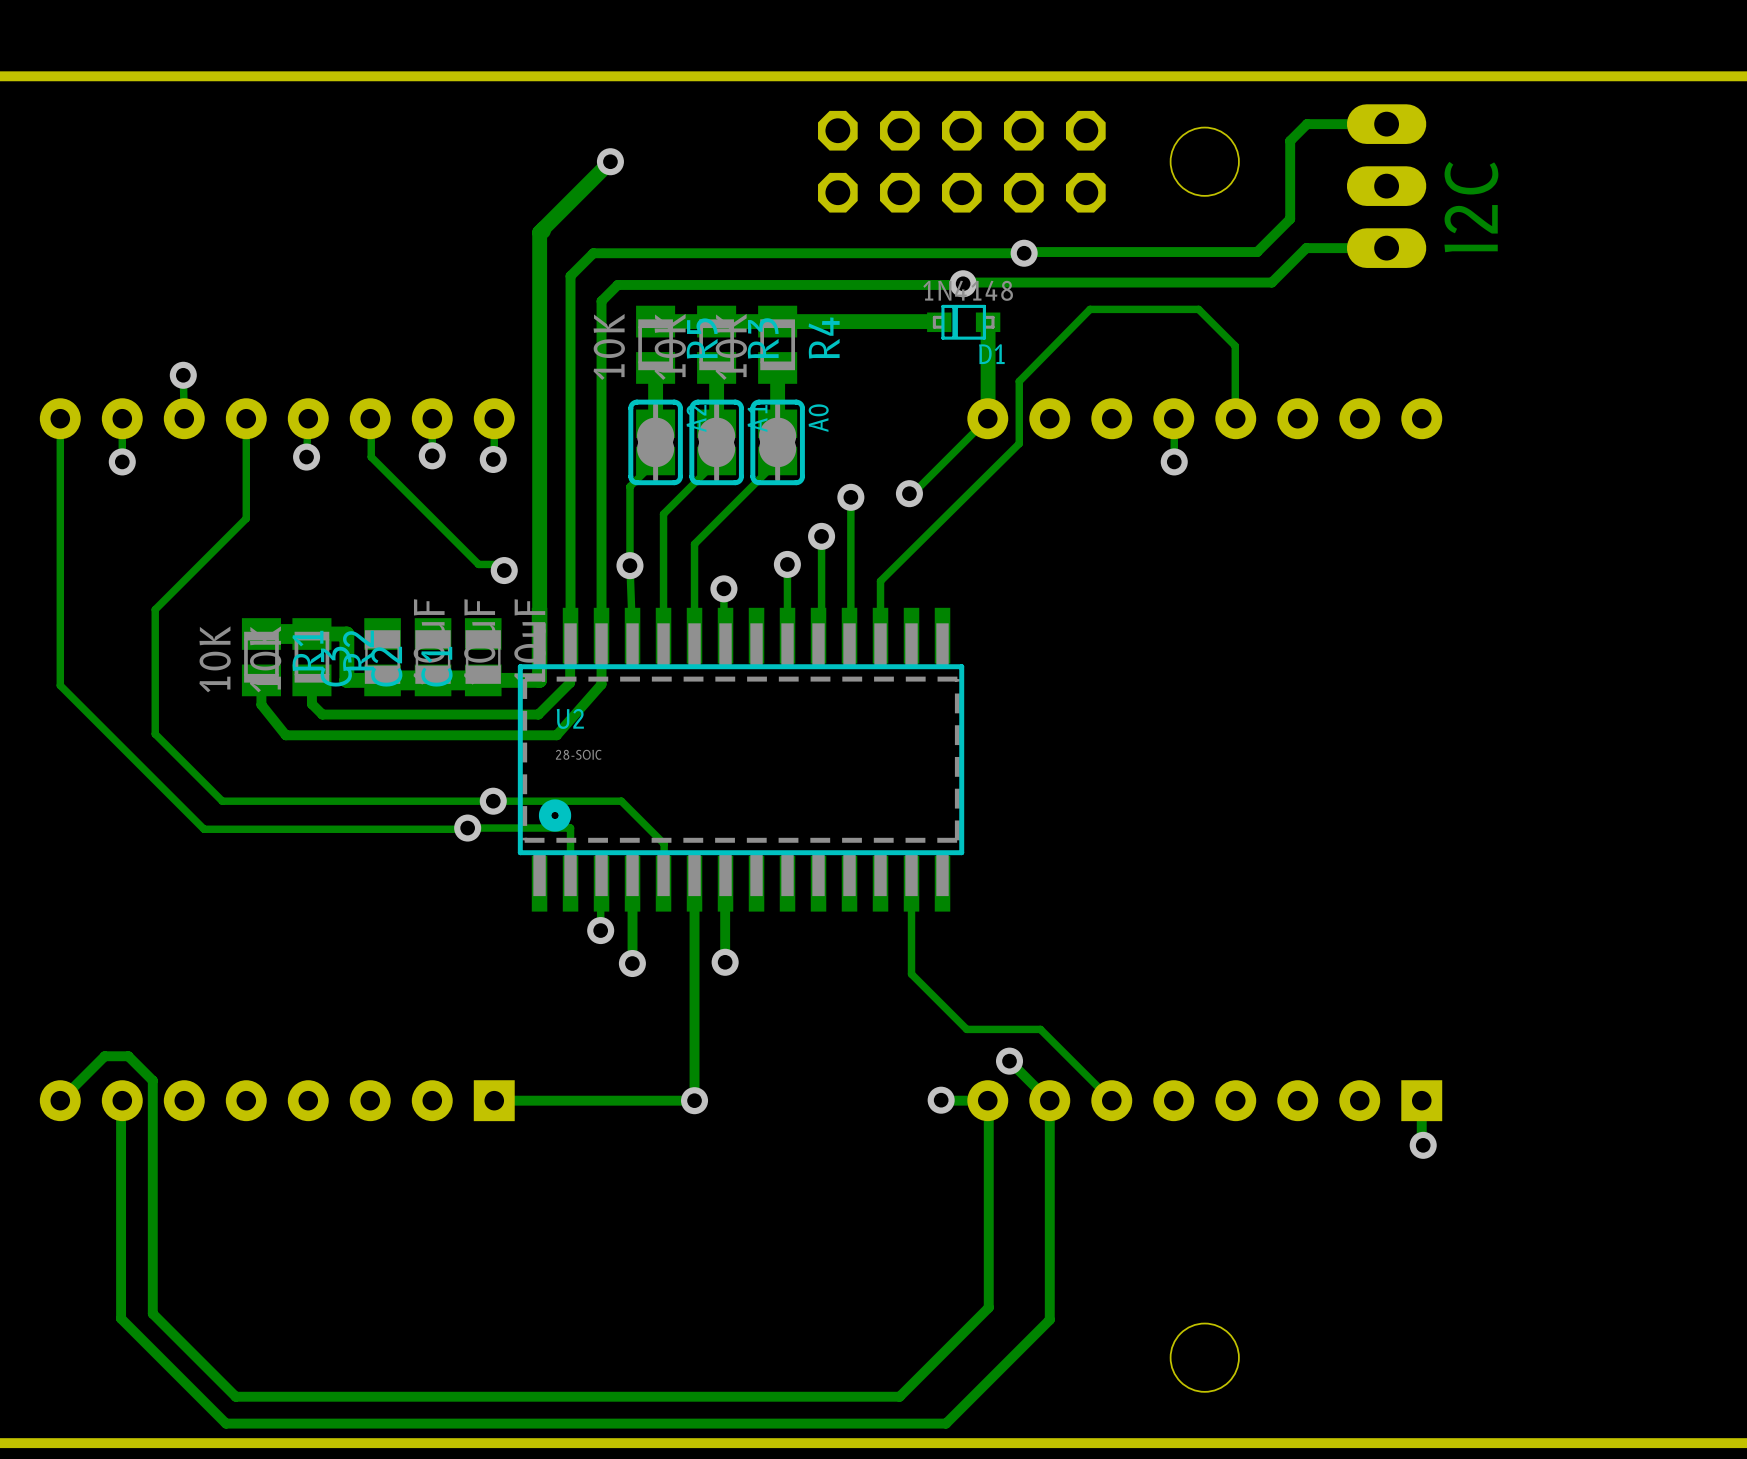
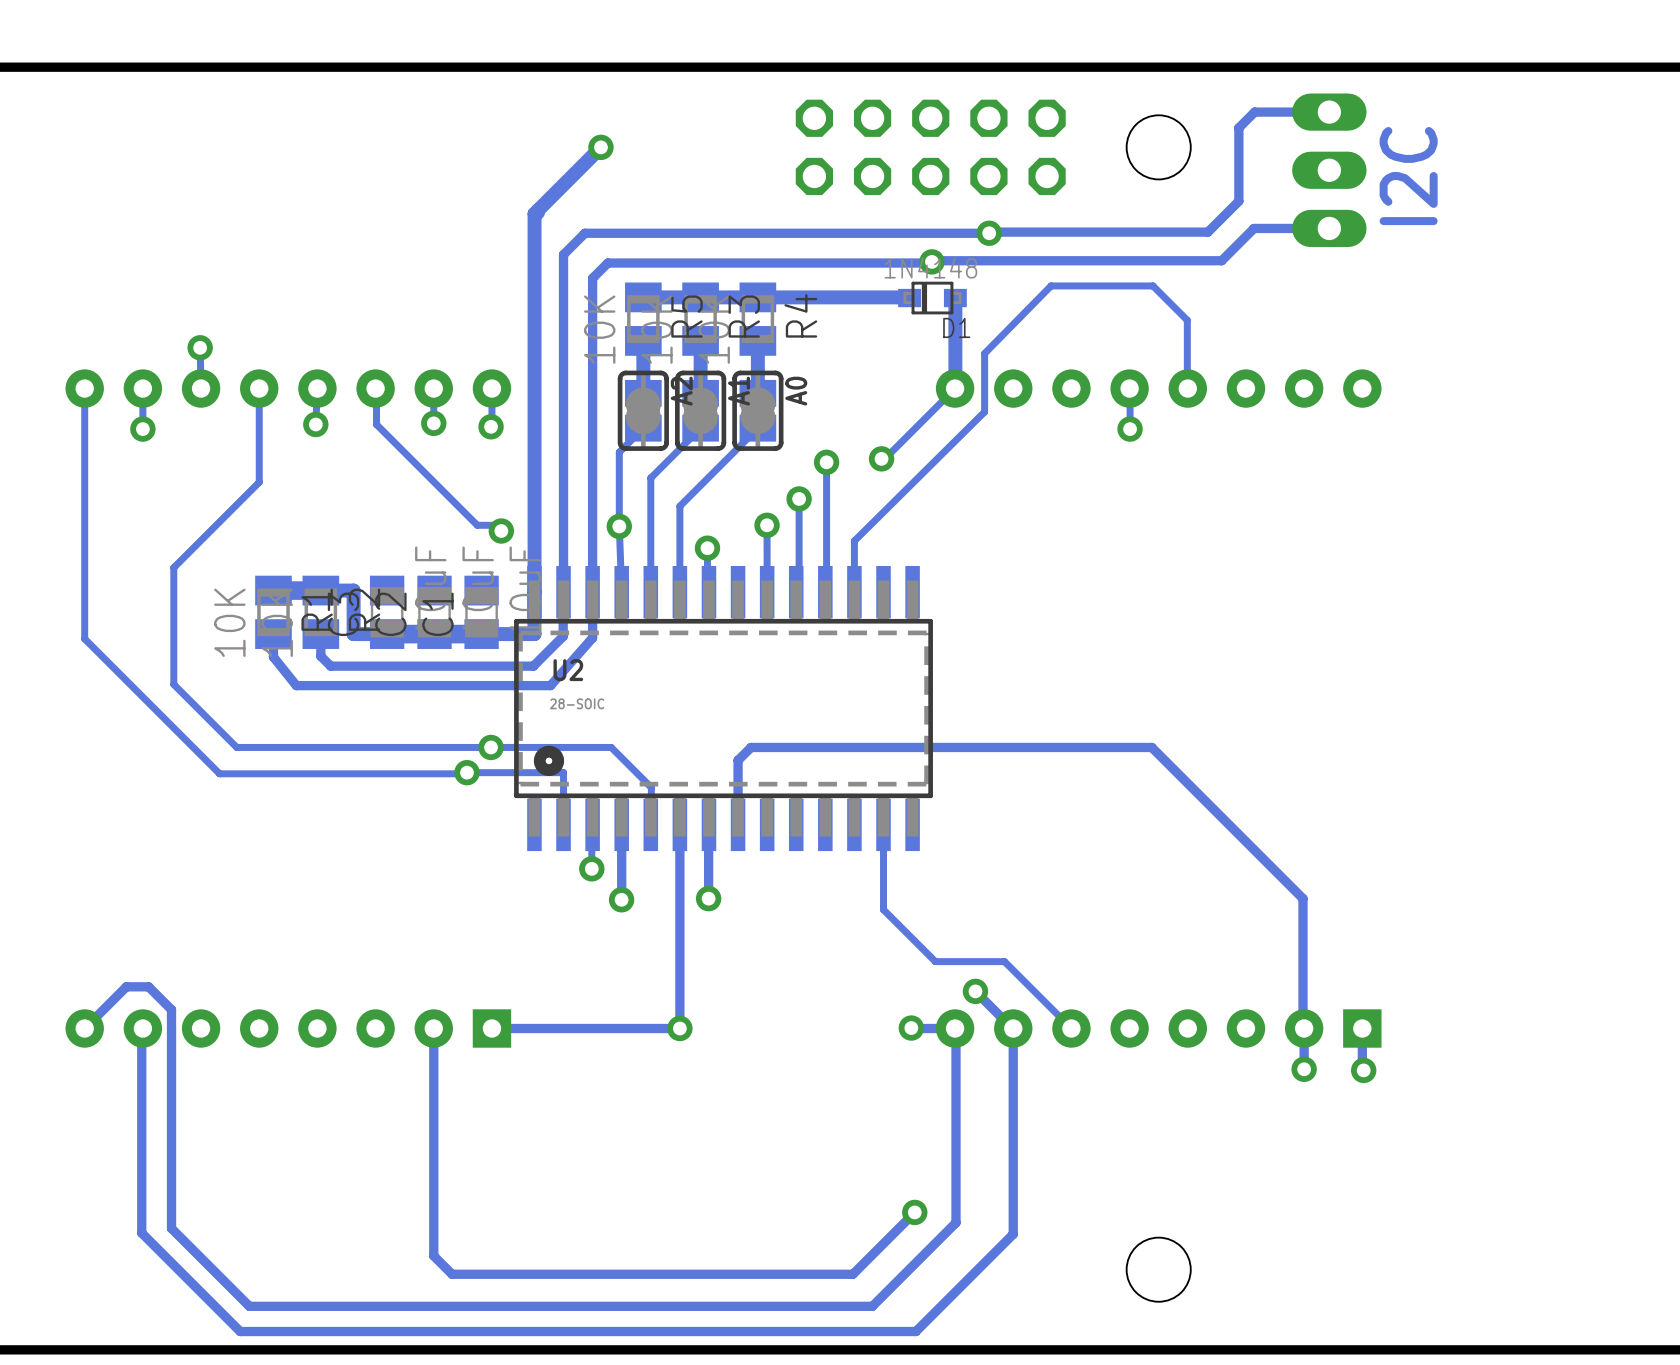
track: none -> (738, 824) (738, 760) (751, 747) (1151, 747) (1303, 898) (1304, 1069)
track: none -> (433, 1028) (433, 1255) (452, 1274) (852, 1274) (914, 1212)
via: none -> (1304, 1069)
via: none -> (914, 1212)

